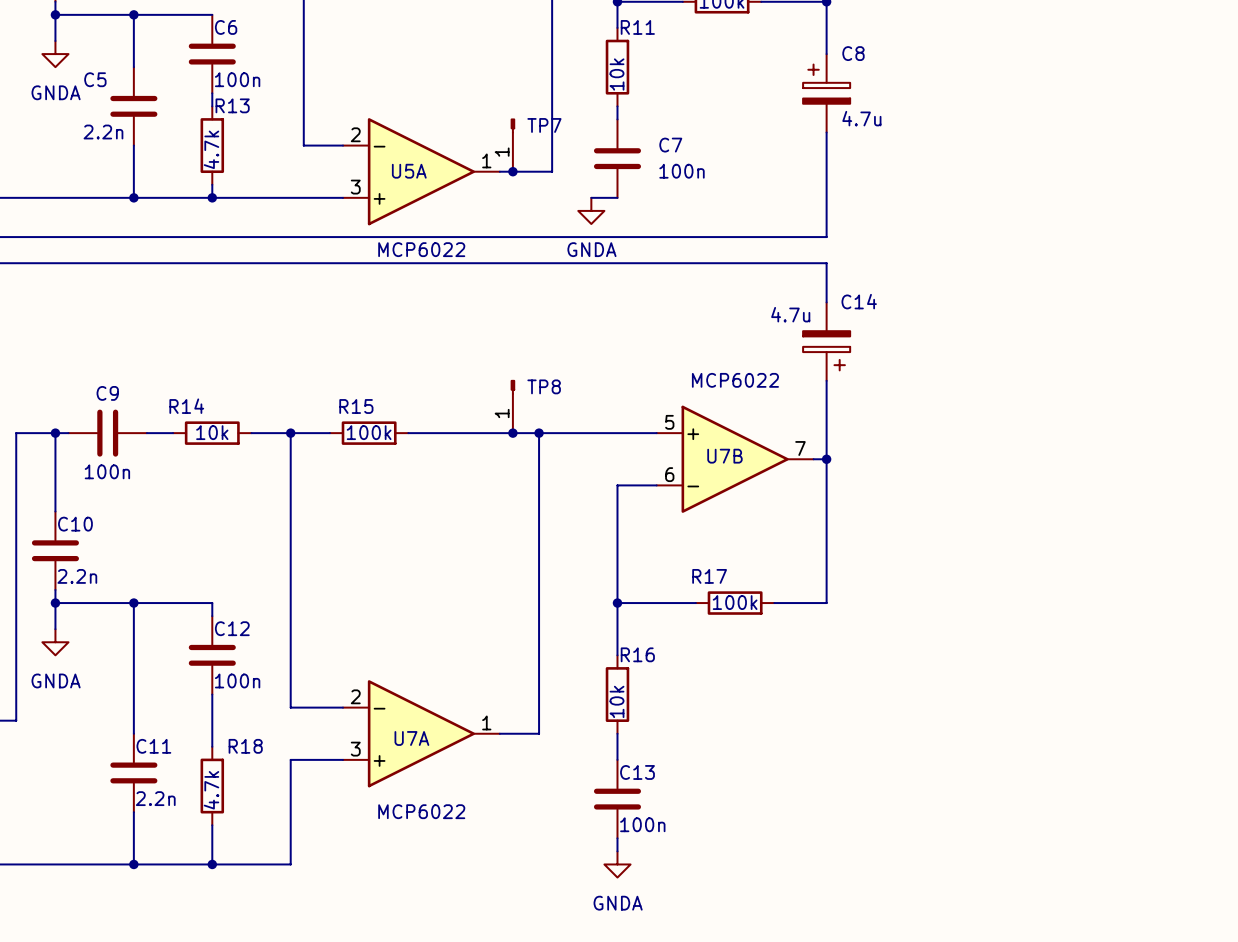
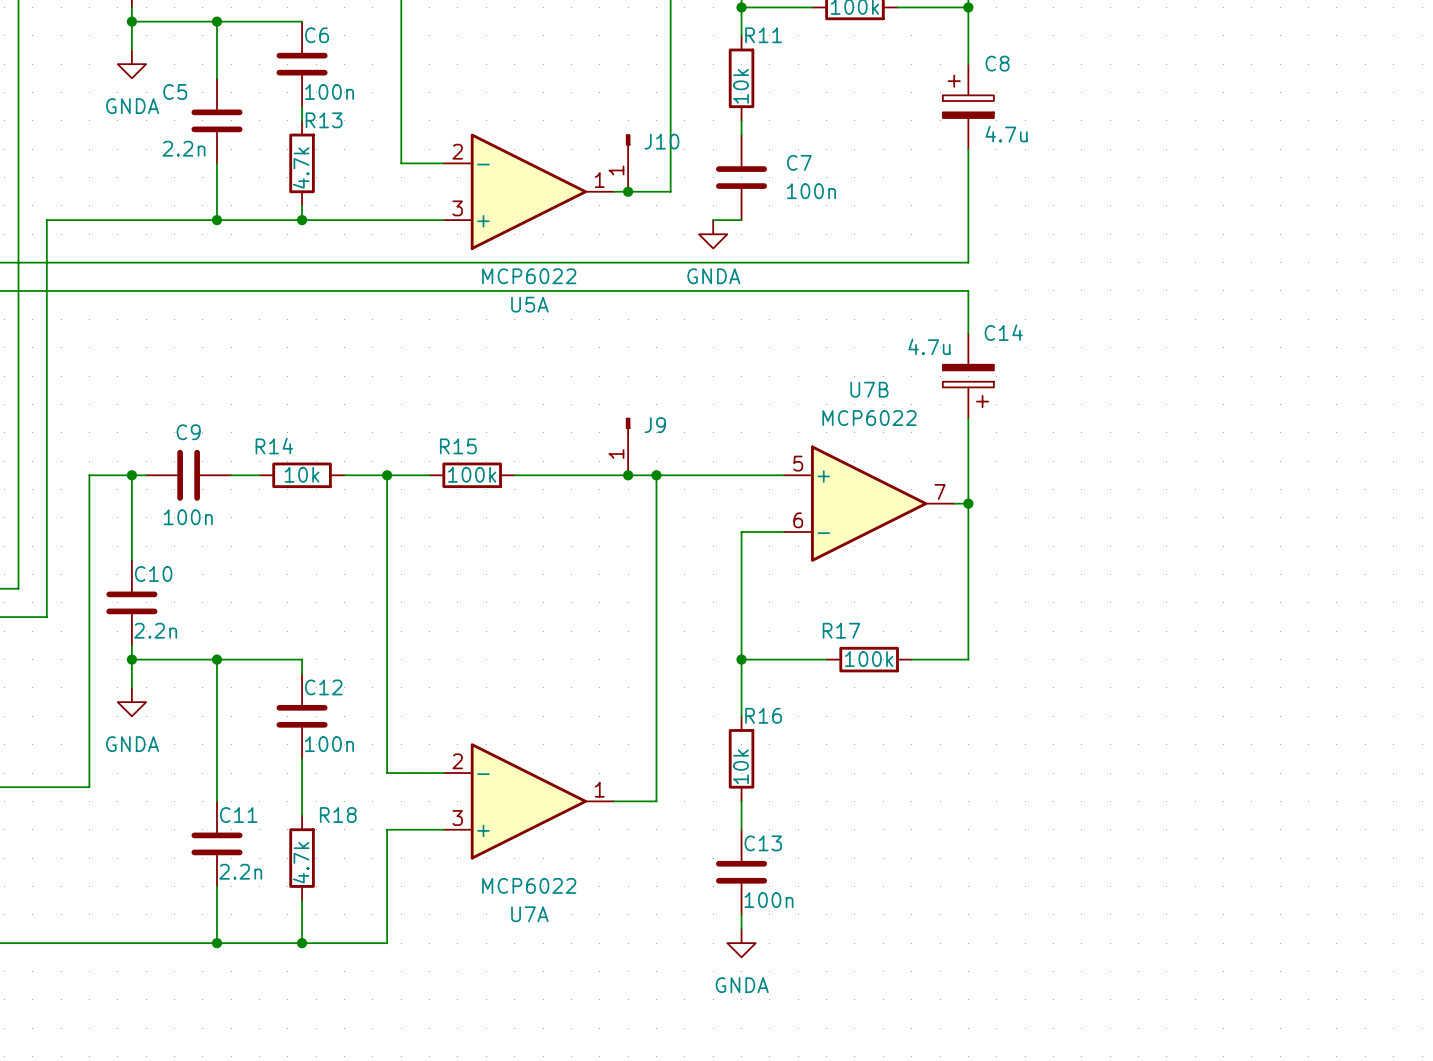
TP7 name: TP7 (544, 125) -> J10 (661, 141)
U5A name position: U5A (409, 171) -> U5A (529, 304)
TP8 name: TP8 (544, 386) -> J9 (655, 425)
U7B name position: U7B (724, 456) -> U7B (869, 389)
U7A name position: U7A (411, 738) -> U7A (529, 914)

